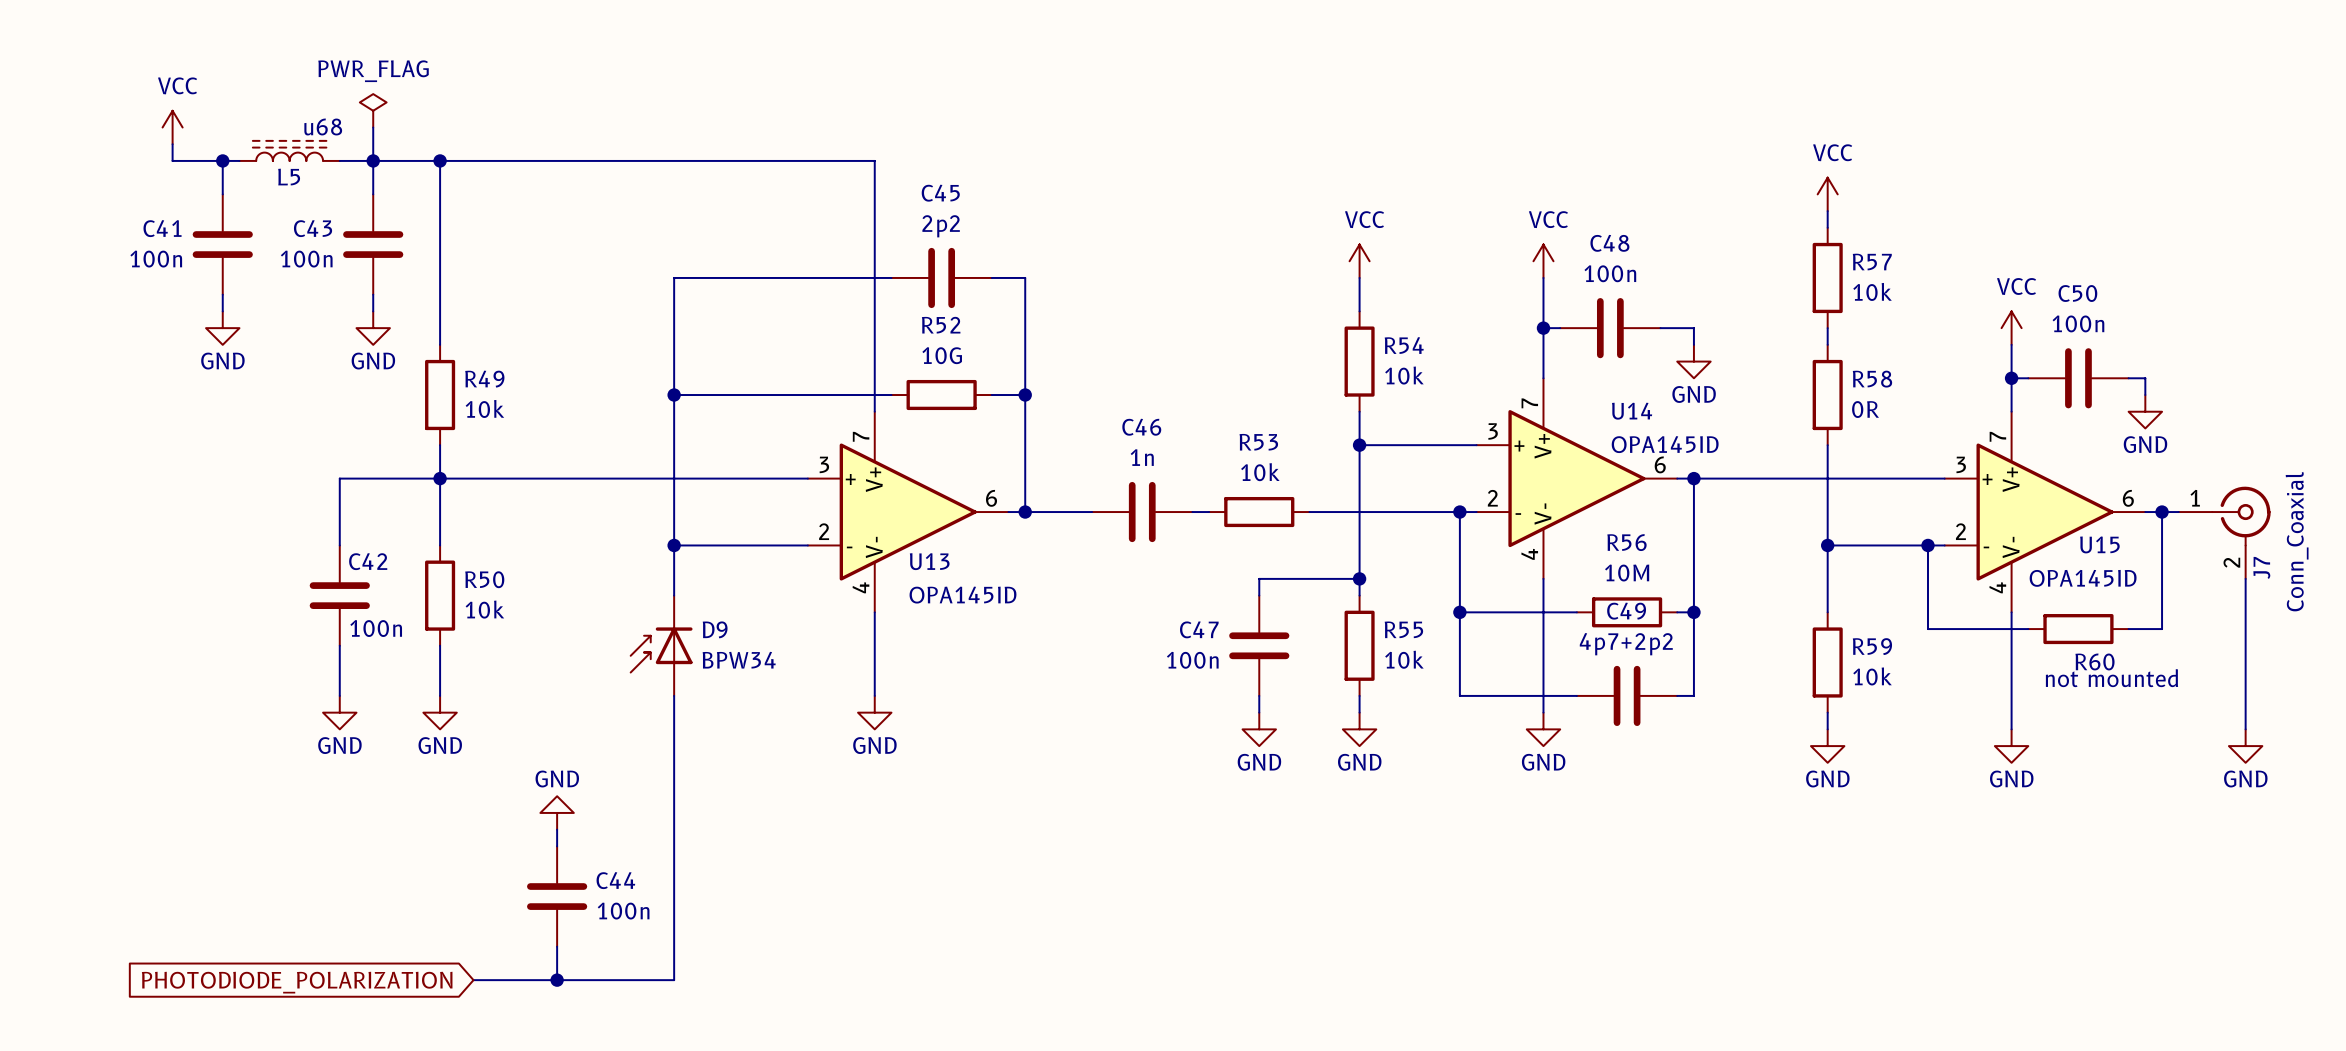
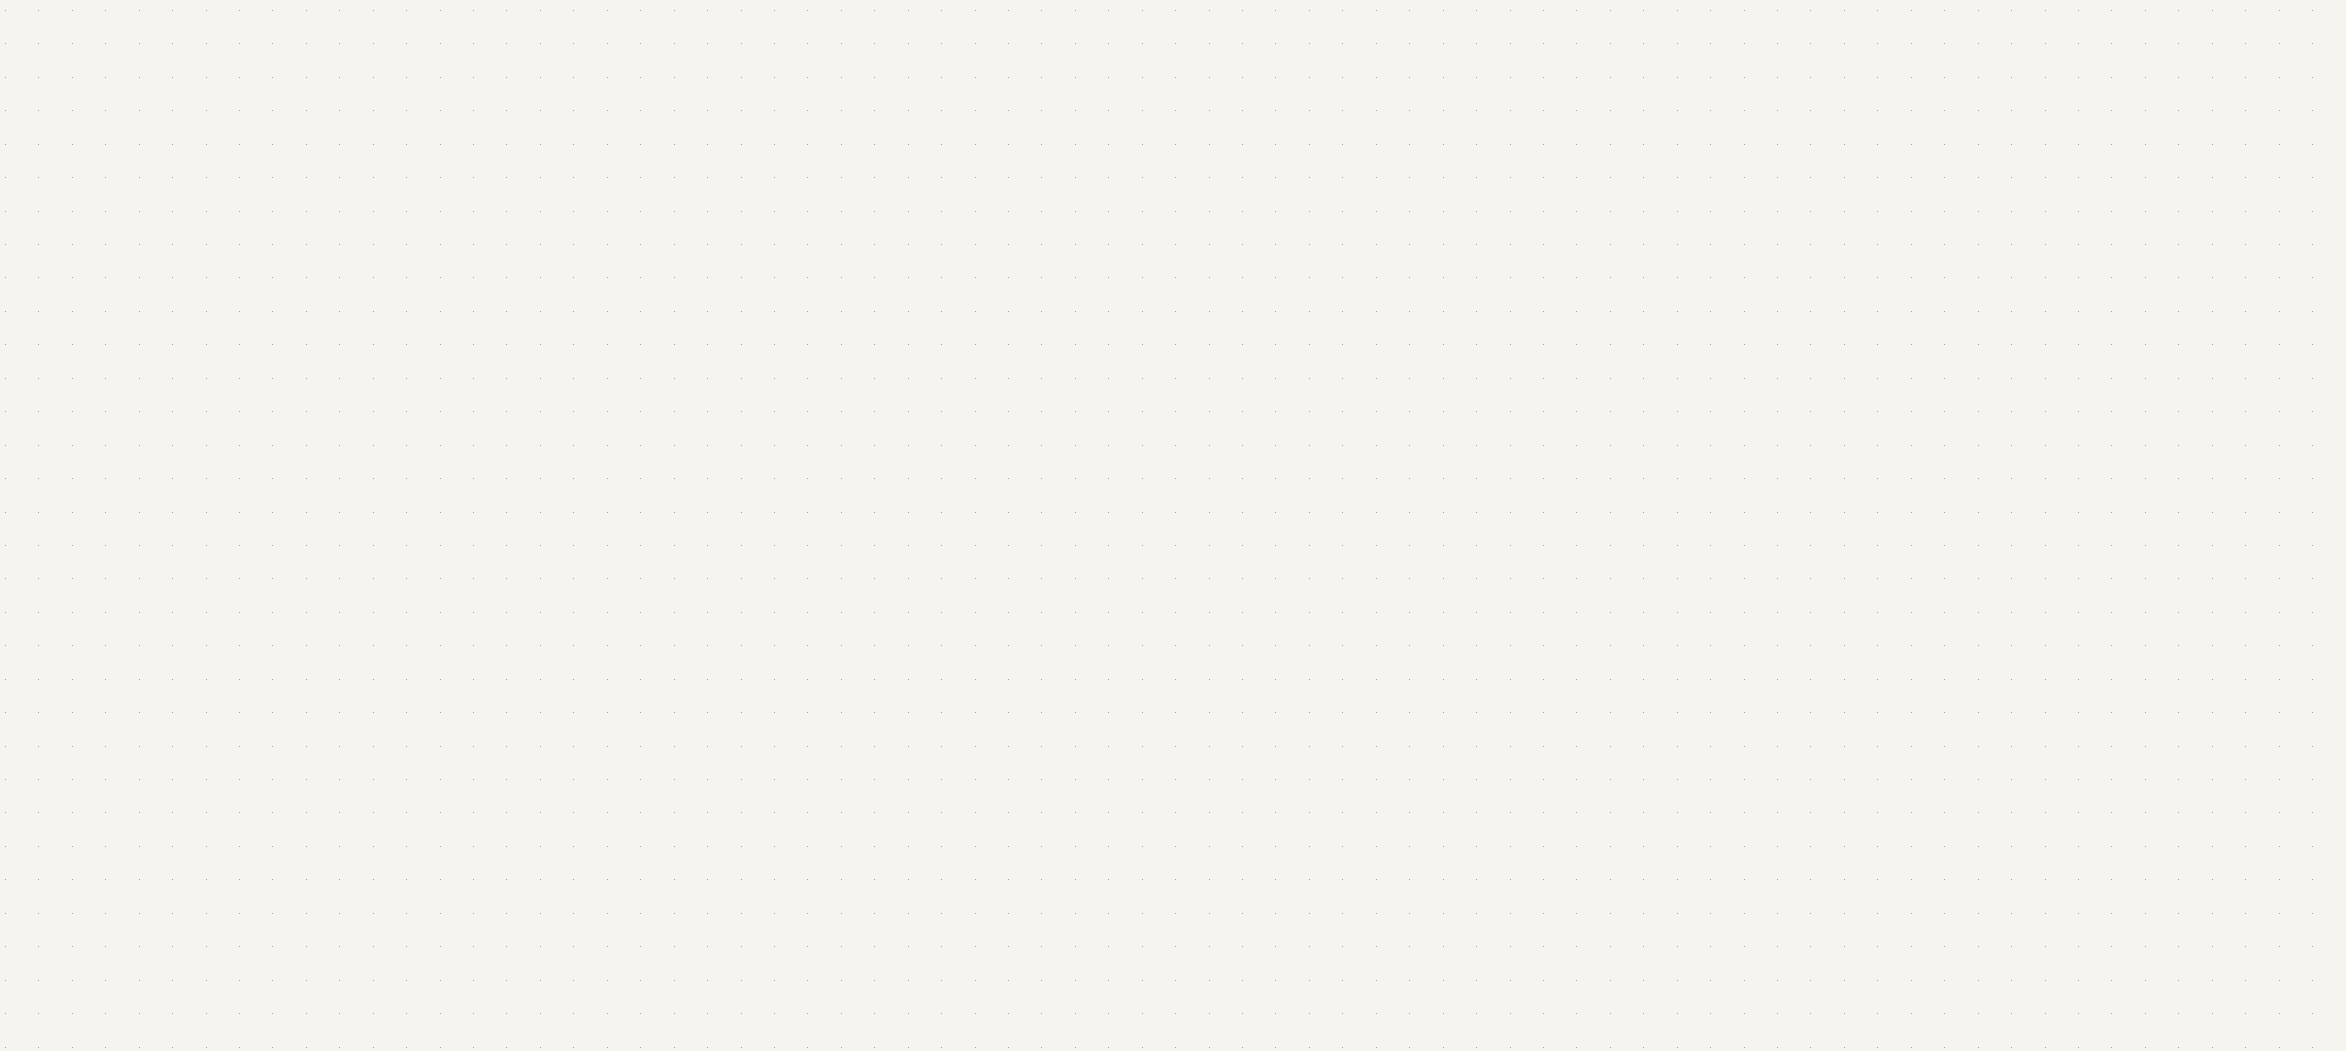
power symbol: PWR_FLAG (373, 110) -> none
power symbol: VCC (172, 127) -> none
wire: (373, 127) (373, 194) -> none
wire: (172, 144) (172, 160) (239, 160) -> none
L5: u68 (289, 150) -> none
wire: (222, 160) (222, 194) -> none
junction: (222, 160) -> none
wire: (339, 160) (874, 160) (874, 411) -> none
junction: (373, 160) -> none
wire: (440, 160) (440, 344) -> none
junction: (440, 160) -> none
power symbol: VCC (1827, 194) -> none
wire: (1827, 211) (1827, 227) -> none
C41: 100n (222, 244) -> none
C43: 100n (373, 244) -> none
power symbol: VCC (1359, 261) -> none
power symbol: VCC (1543, 261) -> none
wire: (891, 277) (674, 277) (674, 595) -> none
C45: 2p2 (941, 277) -> none
wire: (991, 277) (1025, 277) (1025, 512) -> none
wire: (1359, 277) (1359, 311) -> none
wire: (1543, 277) (1543, 378) -> none
R57: 10k (1827, 277) -> none
wire: (222, 294) (222, 311) -> none
wire: (373, 294) (373, 311) -> none
power symbol: GND (222, 328) -> none
power symbol: GND (373, 328) -> none
wire: (1543, 328) (1560, 328) -> none
junction: (1543, 328) -> none
C48: 100n (1610, 328) -> none
wire: (1660, 328) (1693, 328) (1693, 344) -> none
wire: (1827, 328) (1827, 344) -> none
power symbol: VCC (2011, 328) -> none
wire: (2011, 344) (2011, 411) -> none
R54: 10k (1359, 361) -> none
power symbol: GND (1693, 361) -> none
wire: (2011, 378) (2028, 378) -> none
junction: (2011, 378) -> none
C50: 100n (2078, 378) -> none
wire: (2128, 378) (2145, 378) (2145, 395) -> none
R49: 10k (440, 395) -> none
wire: (674, 395) (891, 395) -> none
junction: (674, 395) -> none
R52: 10G (941, 395) -> none
wire: (991, 395) (1025, 395) -> none
junction: (1025, 395) -> none
R58: 0R (1827, 395) -> none
wire: (1359, 411) (1359, 595) -> none
power symbol: GND (2145, 411) -> none
wire: (440, 445) (440, 545) -> none
wire: (1359, 445) (1476, 445) -> none
junction: (1359, 445) -> none
wire: (1827, 445) (1827, 612) -> none
junction: (440, 478) -> none
wire: (807, 478) (339, 478) (339, 545) -> none
U14: OPA145ID (1576, 478) -> none
wire: (1677, 478) (1944, 478) -> none
wire: (1693, 478) (1693, 695) (1677, 695) -> none
junction: (1693, 478) -> none
U13: OPA145ID (908, 512) -> none
wire: (1008, 512) (1092, 512) -> none
junction: (1025, 512) -> none
C46: 1n (1142, 512) -> none
wire: (1192, 512) (1209, 512) -> none
R53: 10k (1259, 512) -> none
wire: (1309, 512) (1476, 512) -> none
wire: (1459, 512) (1459, 695) (1576, 695) -> none
junction: (1459, 512) -> none
U15: OPA145ID (2045, 512) -> none
wire: (2145, 512) (2178, 512) -> none
wire: (2162, 512) (2162, 629) (2128, 629) -> none
junction: (2162, 512) -> none
J7: Conn_Coaxial (2224, 532) -> none
wire: (674, 545) (807, 545) -> none
junction: (674, 545) -> none
wire: (1827, 545) (1944, 545) -> none
junction: (1827, 545) -> none
wire: (1928, 545) (1928, 629) (2028, 629) -> none
junction: (1928, 545) -> none
wire: (1359, 578) (1259, 578) (1259, 595) -> none
junction: (1359, 578) -> none
wire: (1543, 578) (1543, 712) -> none
wire: (2245, 578) (2245, 729) -> none
C42: 100n (339, 595) -> none
R50: 10k (440, 595) -> none
wire: (874, 612) (874, 695) -> none
wire: (1459, 612) (1576, 612) -> none
junction: (1459, 612) -> none
R56: 10M (1627, 612) -> none
wire: (1677, 612) (1693, 612) -> none
junction: (1693, 612) -> none
wire: (2011, 612) (2011, 729) -> none
R60: not mounted (2078, 629) -> none
wire: (339, 645) (339, 695) -> none
wire: (440, 645) (440, 695) -> none
D9: BPW34 (661, 645) -> none
C47: 100n (1259, 645) -> none
R55: 10k (1359, 645) -> none
R59: 10k (1827, 662) -> none
wire: (674, 695) (674, 980) (473, 980) -> none
wire: (1259, 695) (1259, 712) -> none
wire: (1359, 695) (1359, 712) -> none
C49: 4p7+2p2 (1627, 695) -> none
power symbol: GND (339, 712) -> none
power symbol: GND (440, 712) -> none
power symbol: GND (874, 712) -> none
wire: (1827, 712) (1827, 729) -> none
power symbol: GND (1259, 729) -> none
power symbol: GND (1359, 729) -> none
power symbol: GND (1543, 729) -> none
power symbol: GND (1827, 746) -> none
power symbol: GND (2011, 746) -> none
power symbol: GND (2245, 746) -> none
power symbol: GND (557, 812) -> none
wire: (557, 829) (557, 846) -> none
C44: 100n (557, 896) -> none
wire: (557, 946) (557, 980) -> none
junction: (557, 980) -> none
global label: PHOTODIODE_POLARIZATION (297, 982) -> none

